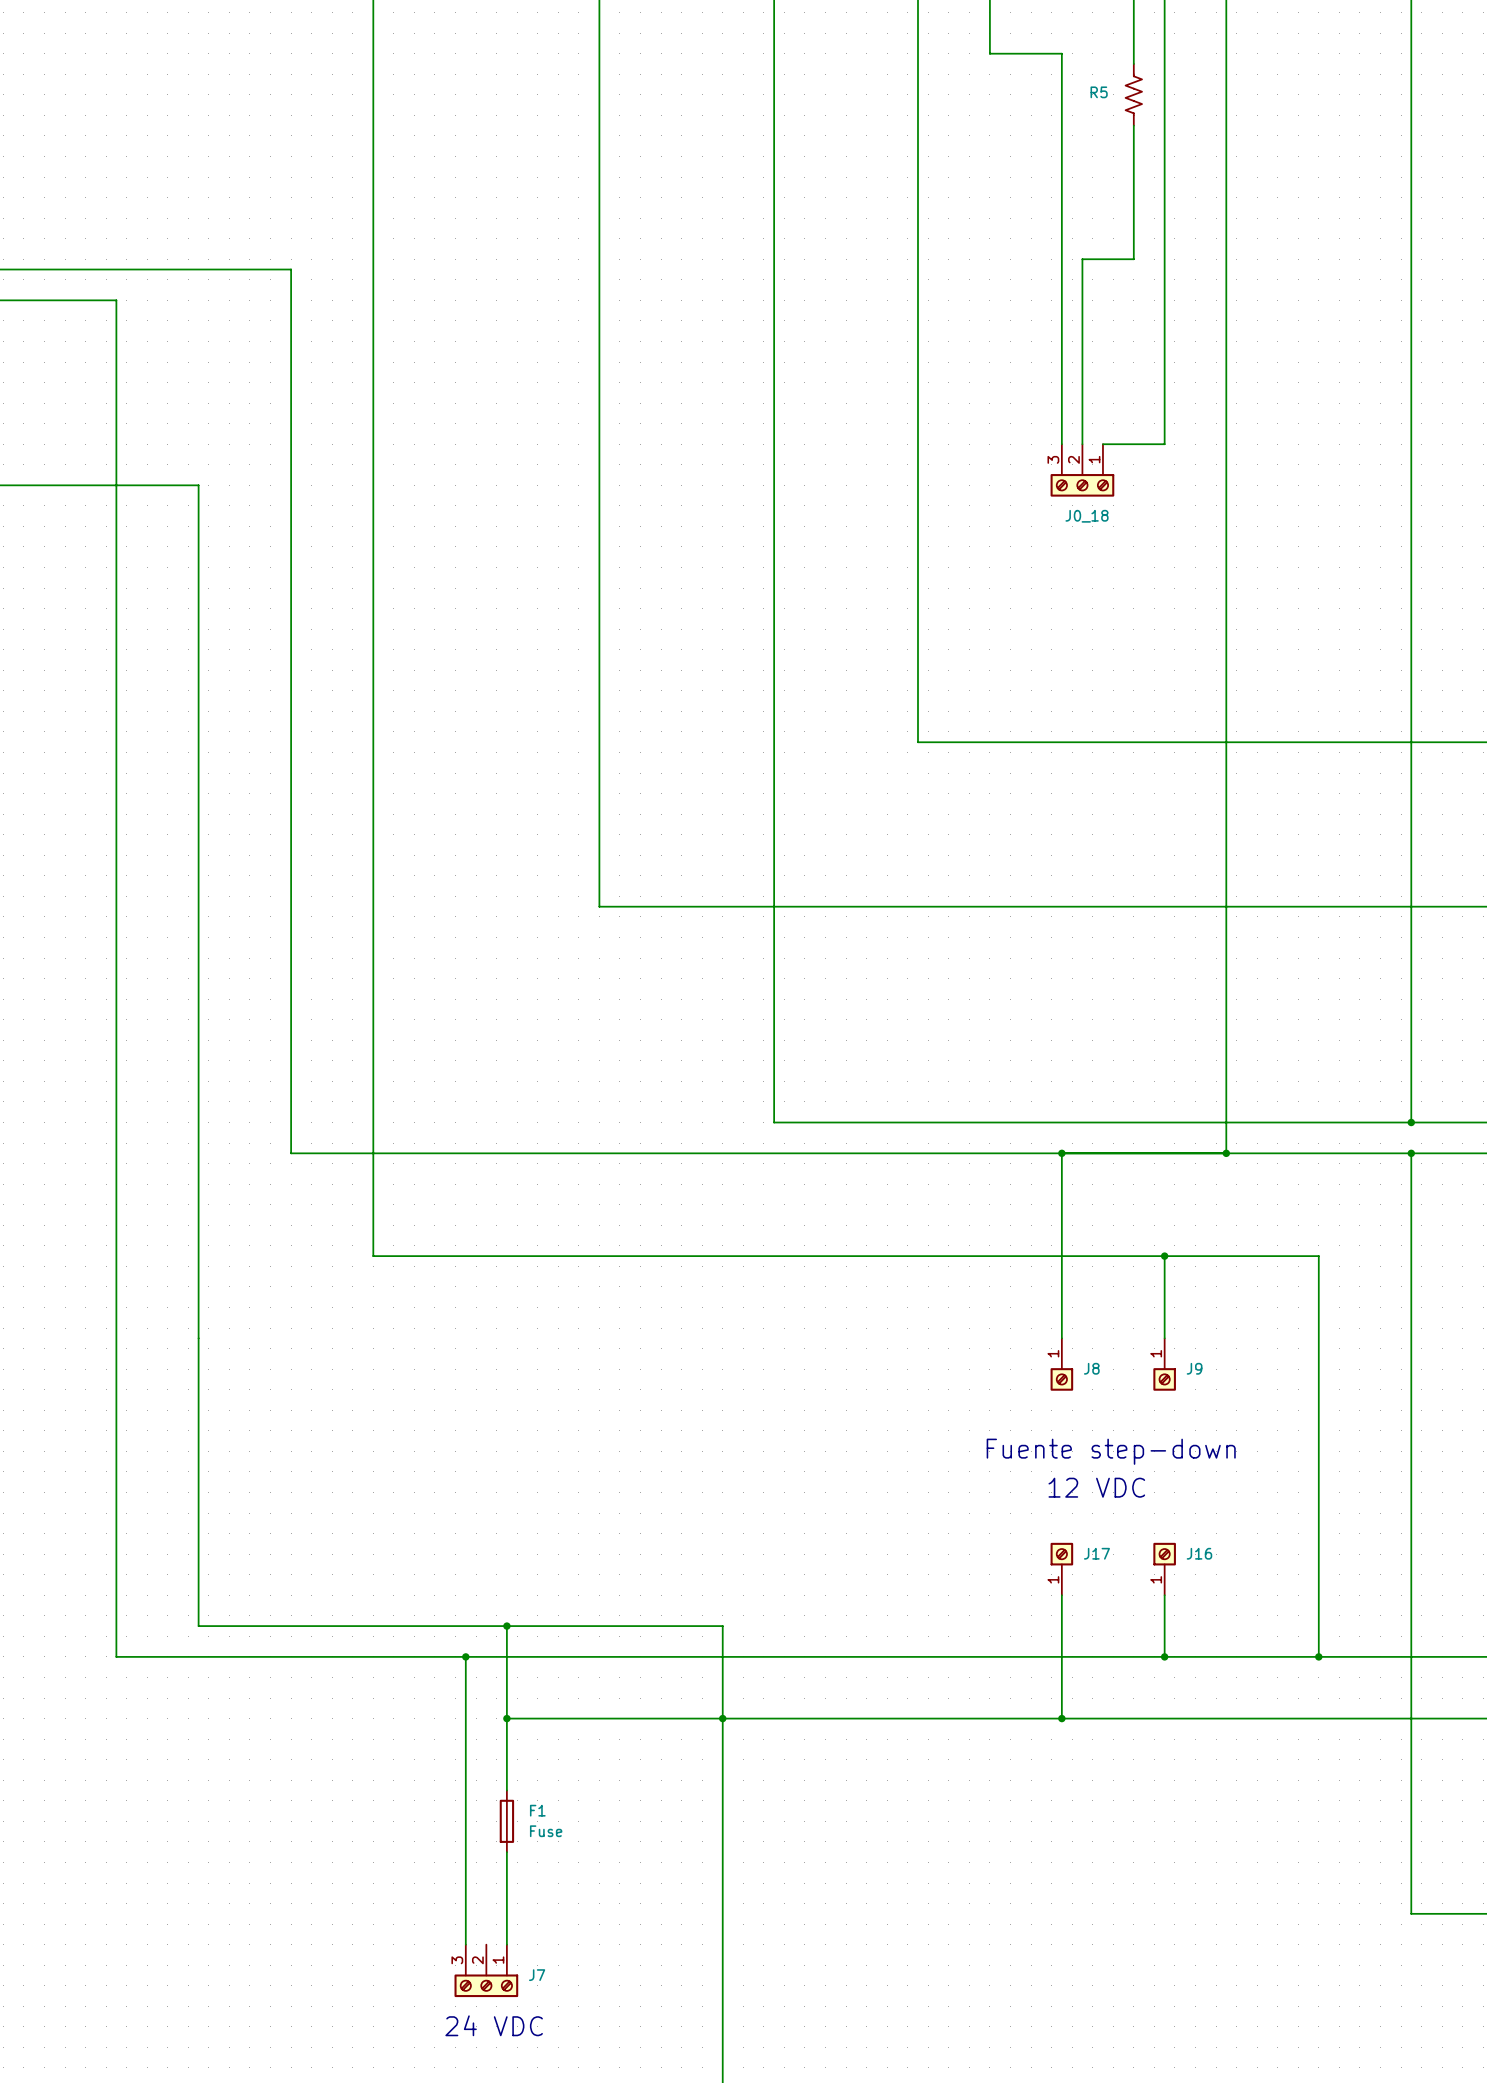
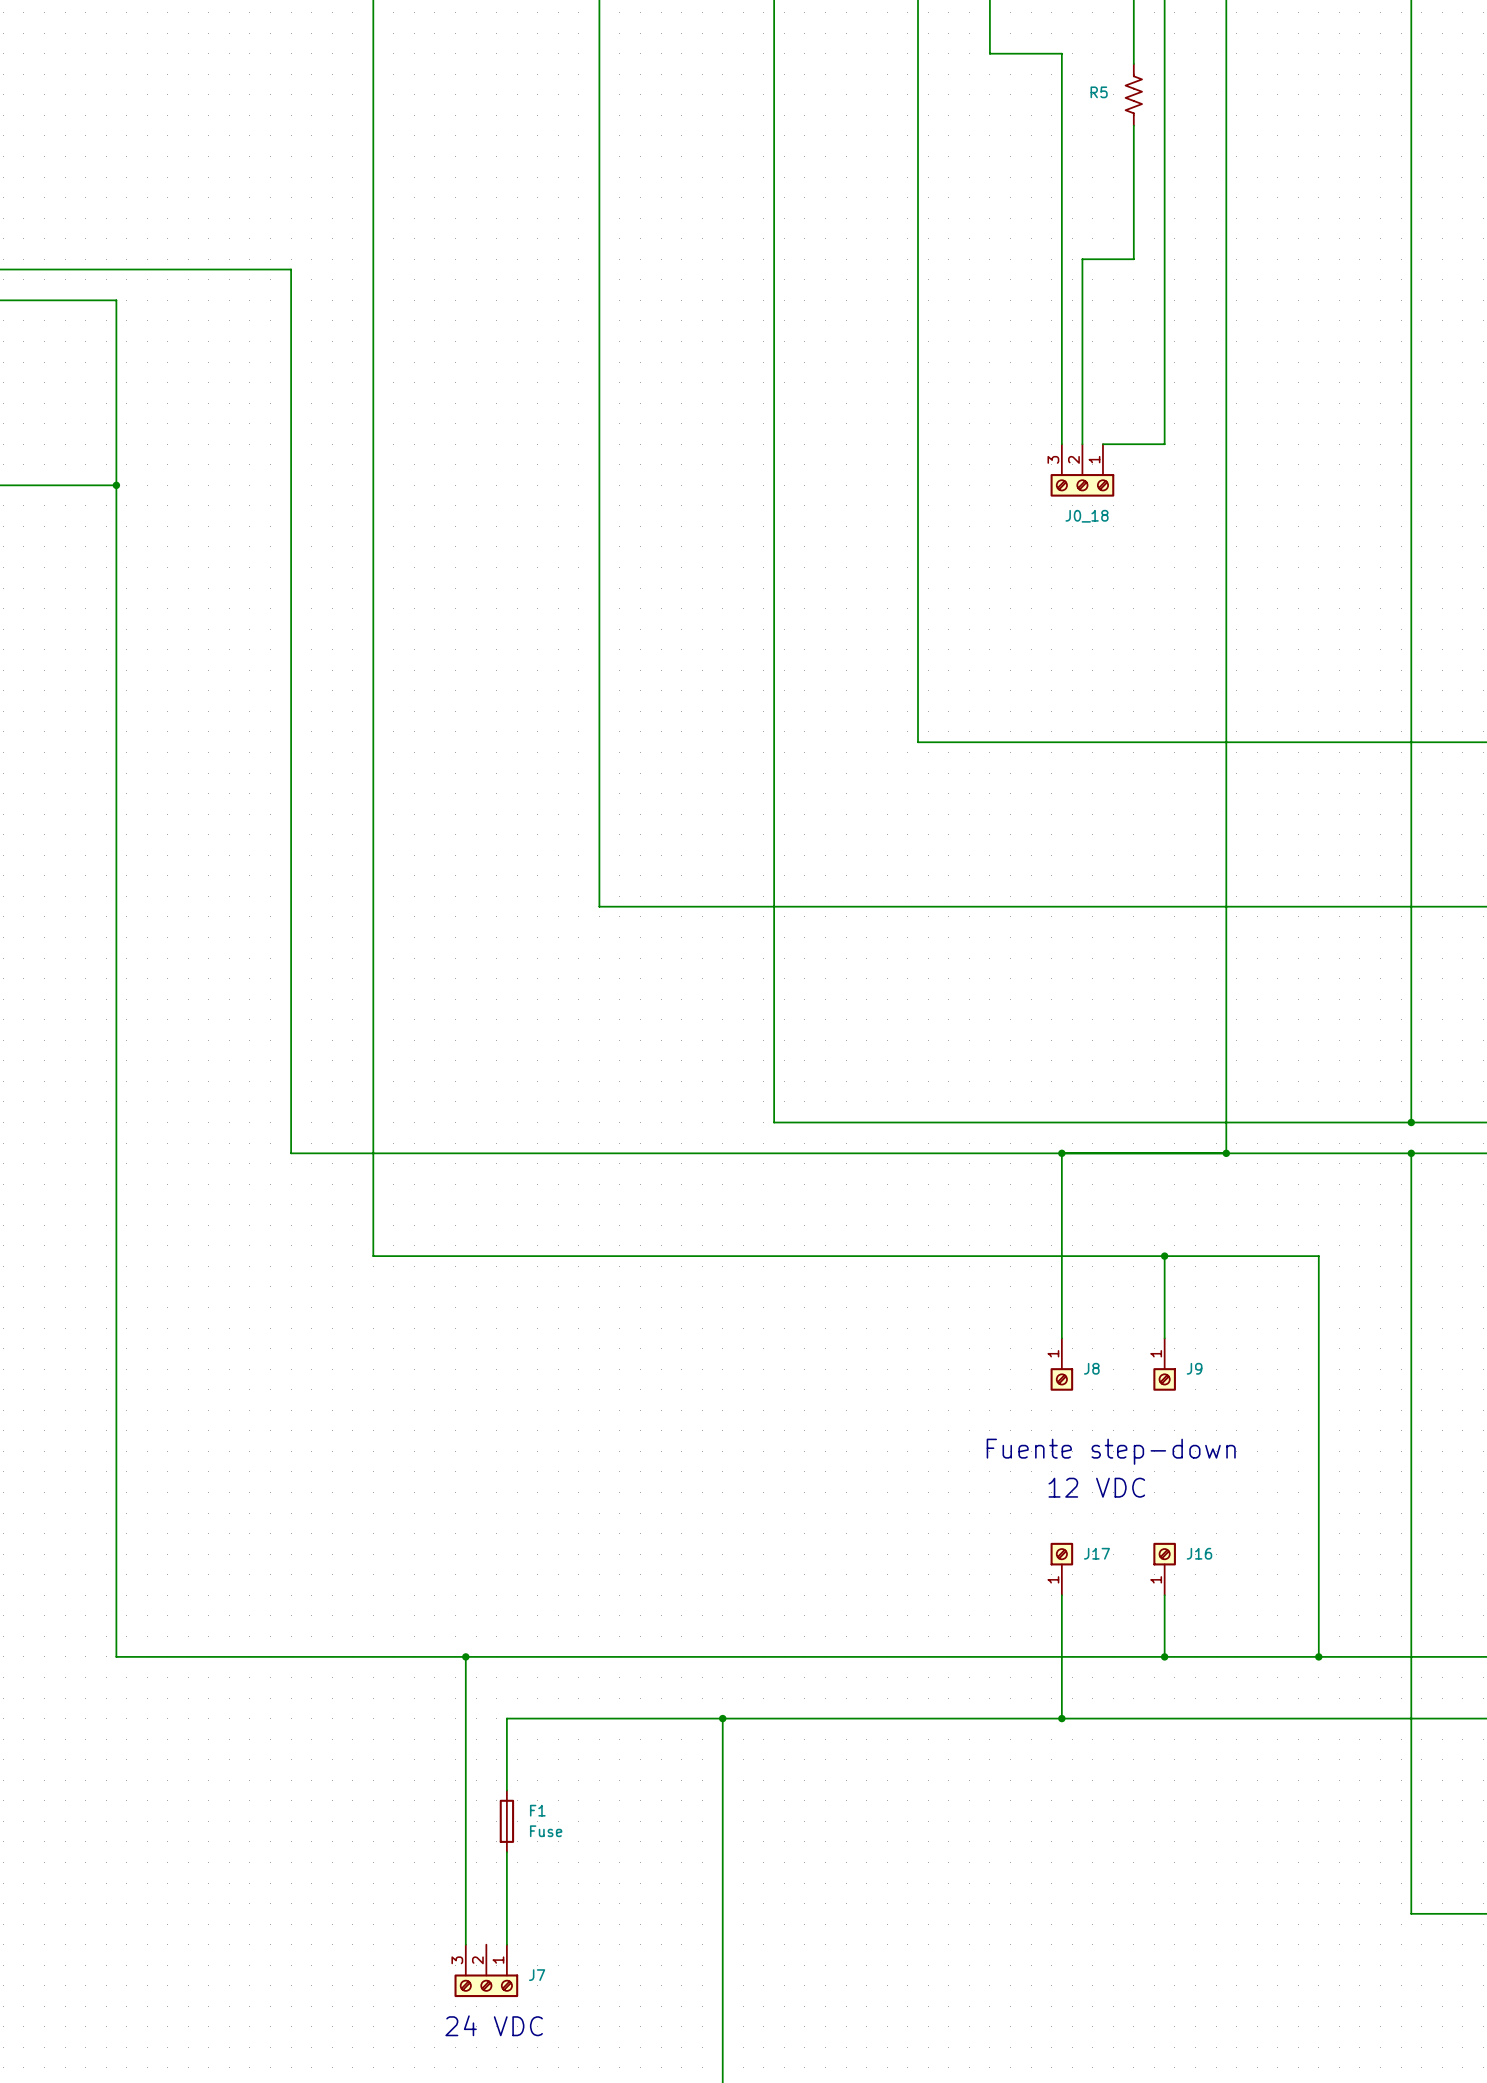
wire: (116, 485) (198, 485) (198, 1626) (722, 1626) (722, 1718) -> none
junction: none -> (116, 485)
wire: (506, 1626) (506, 1718) -> none
junction: (506, 1626) -> none
junction: (506, 1718) -> none

